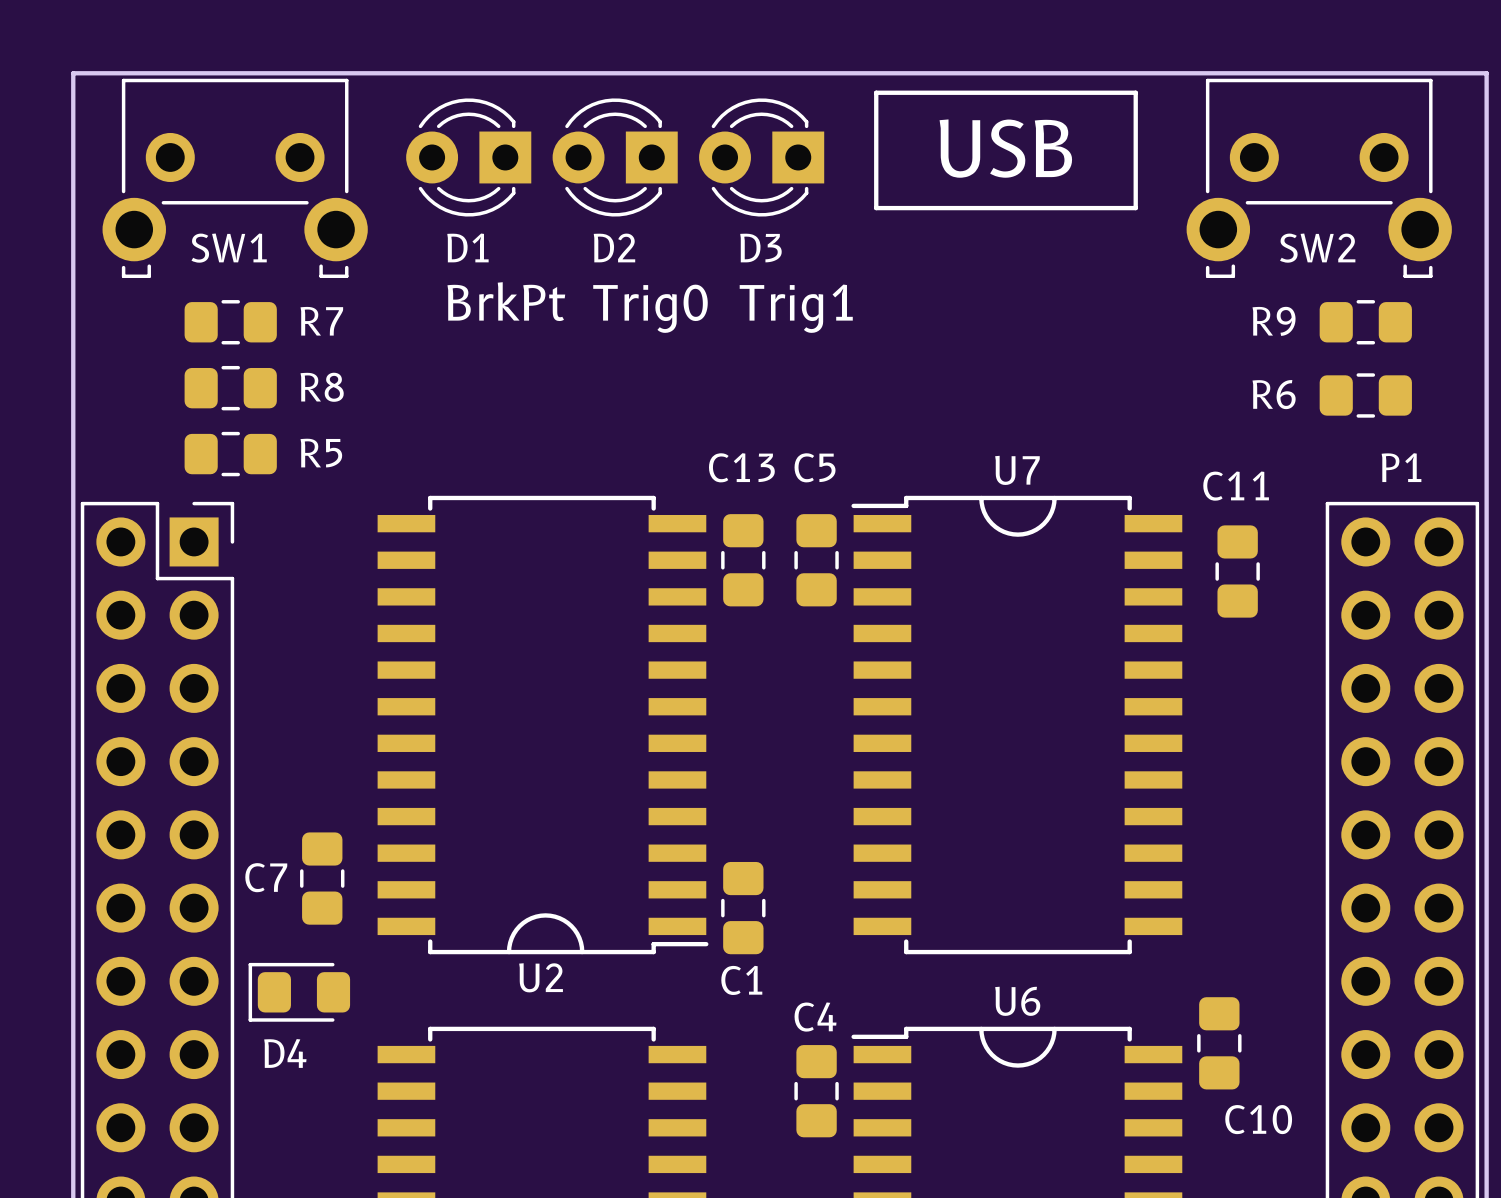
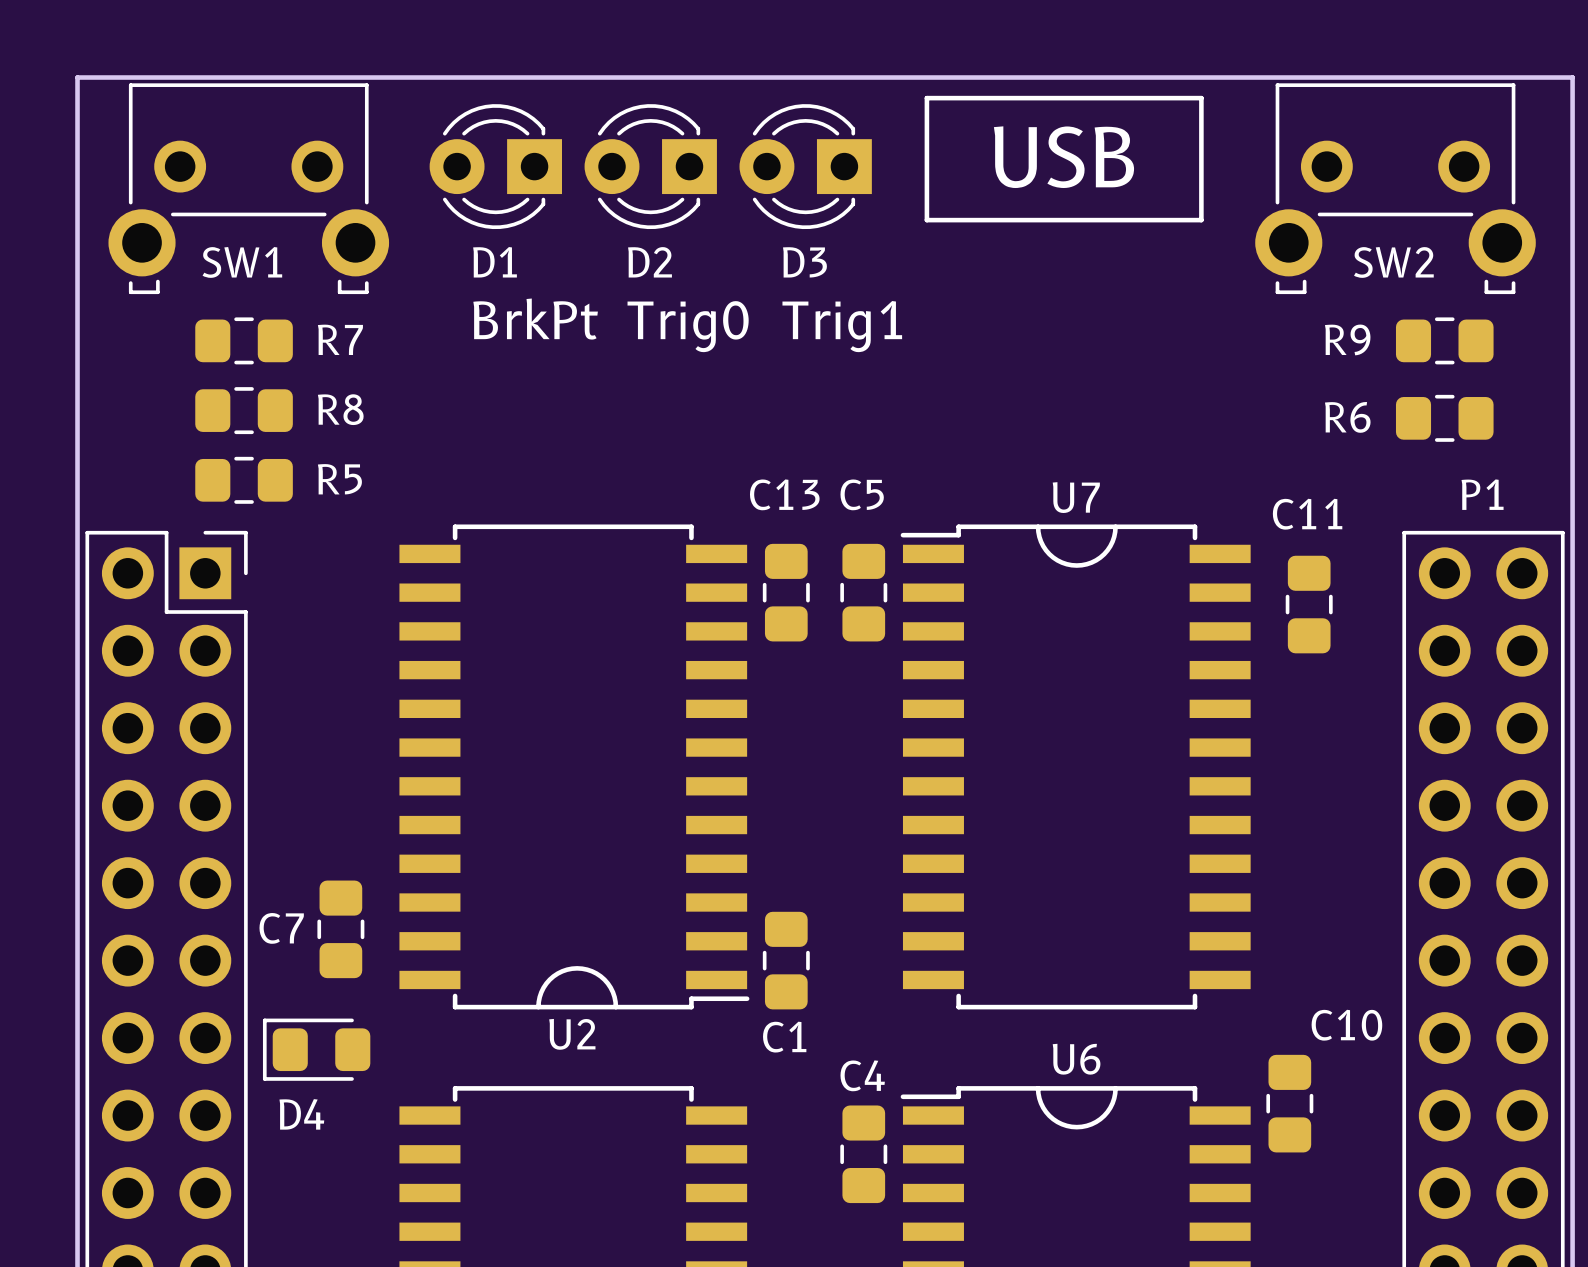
C10 name position: C10 (1258, 1119) -> C10 (1346, 1025)

